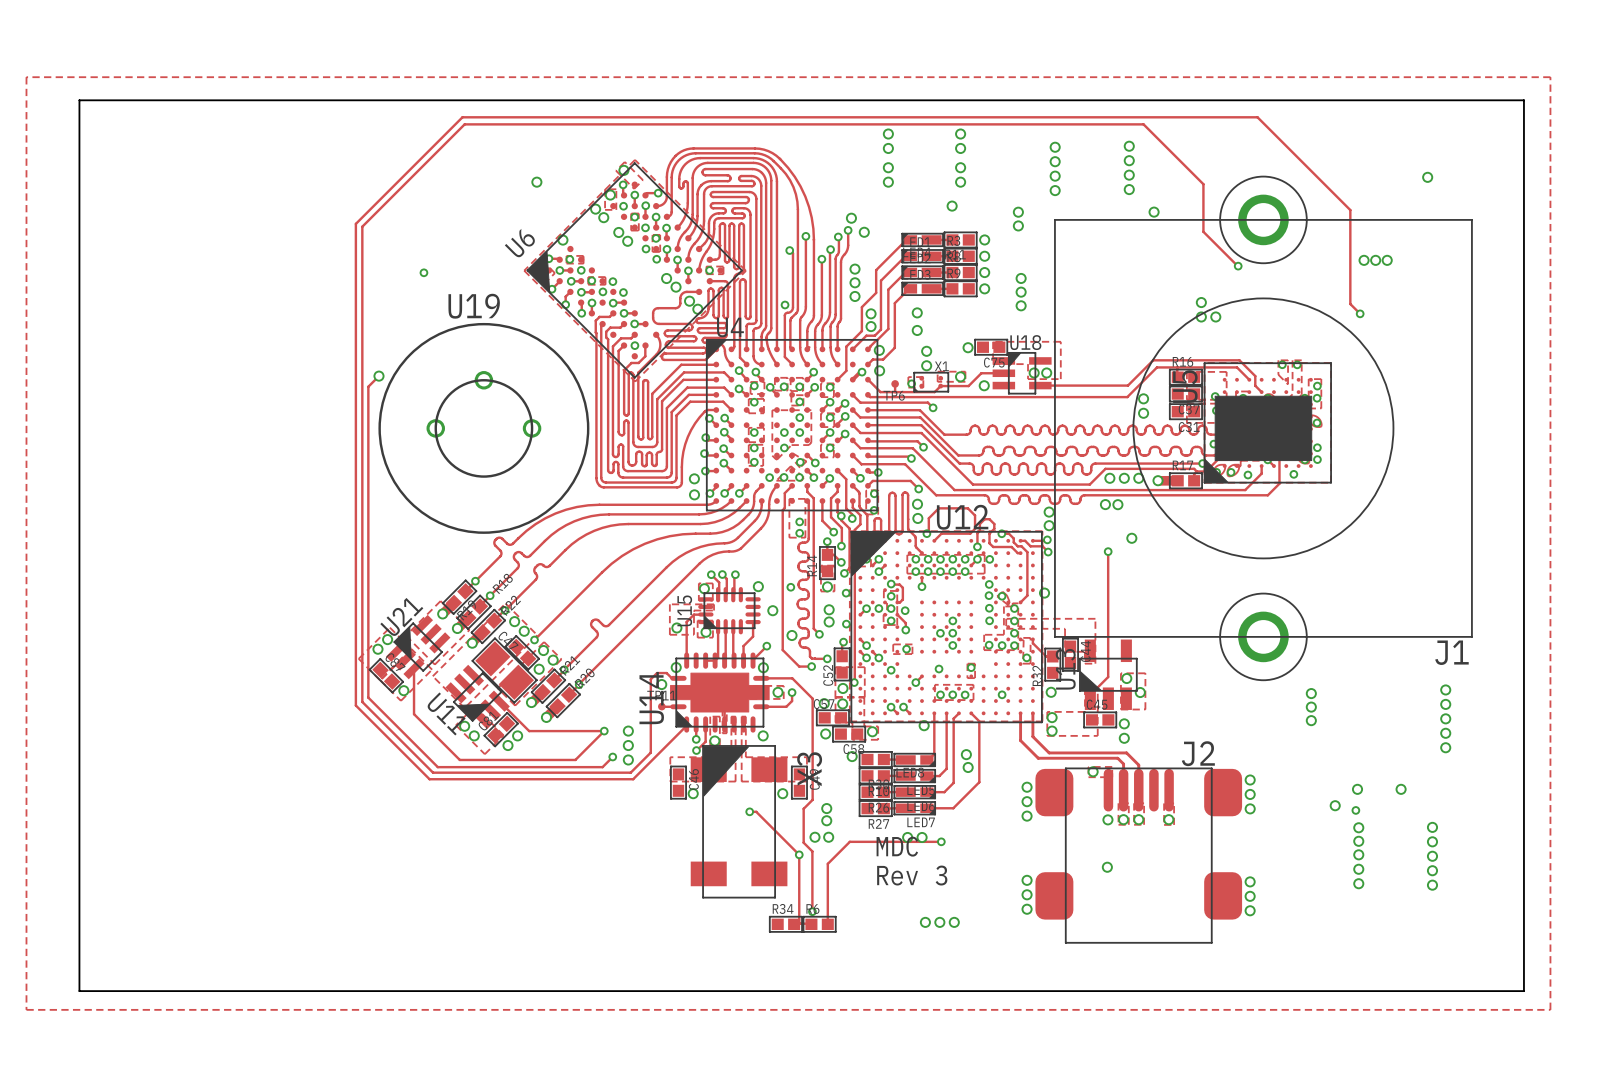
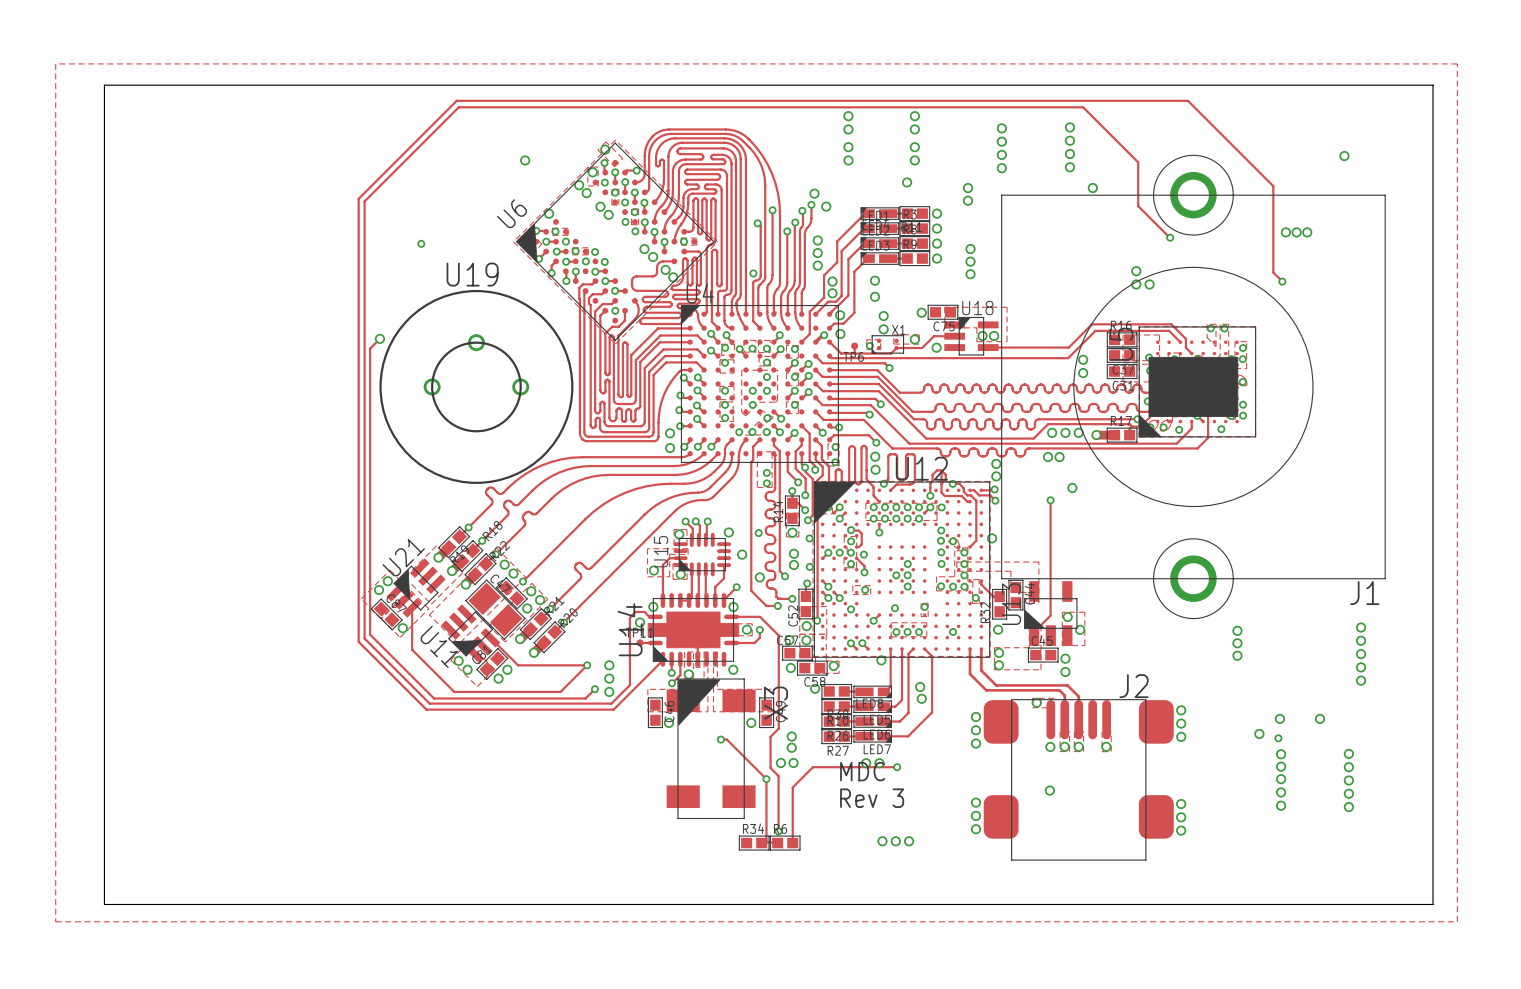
track: (928, 531) (928, 518) (938, 508) (967, 508) (975, 515) (975, 528) (970, 533) (939, 535) -> (885, 481) (888, 478) (888, 454) (896, 455) (897, 477) (903, 479) (905, 477) (906, 455) (913, 454) (914, 482) (910, 484) (895, 485)

